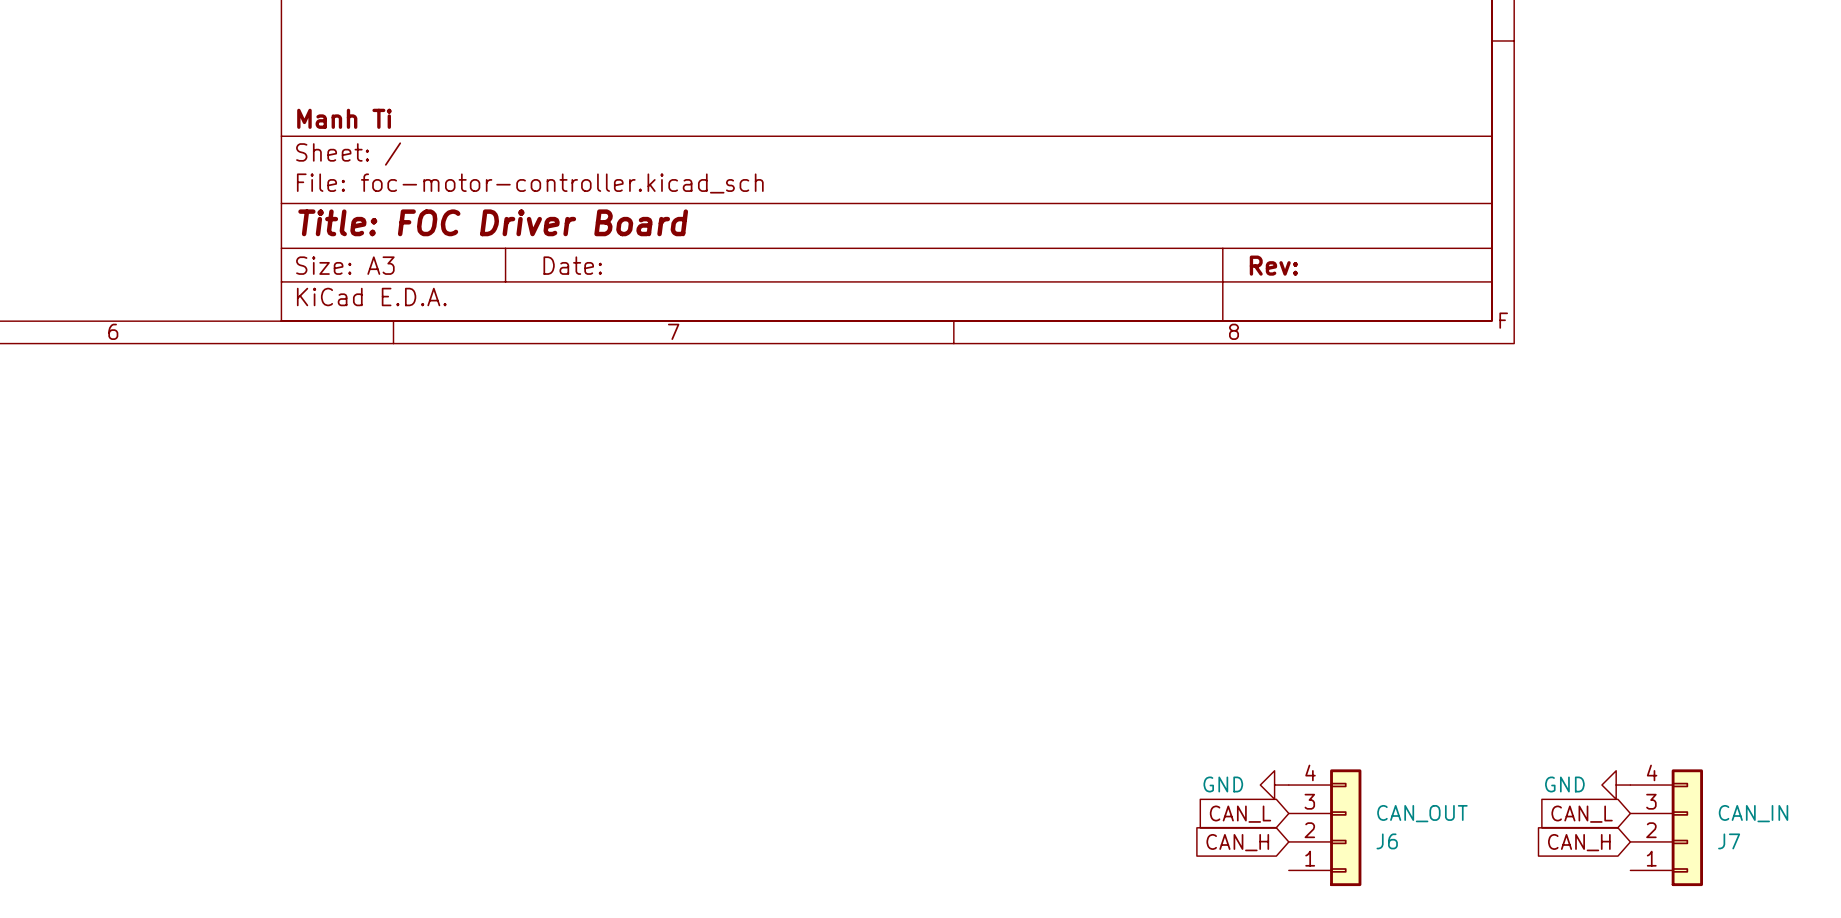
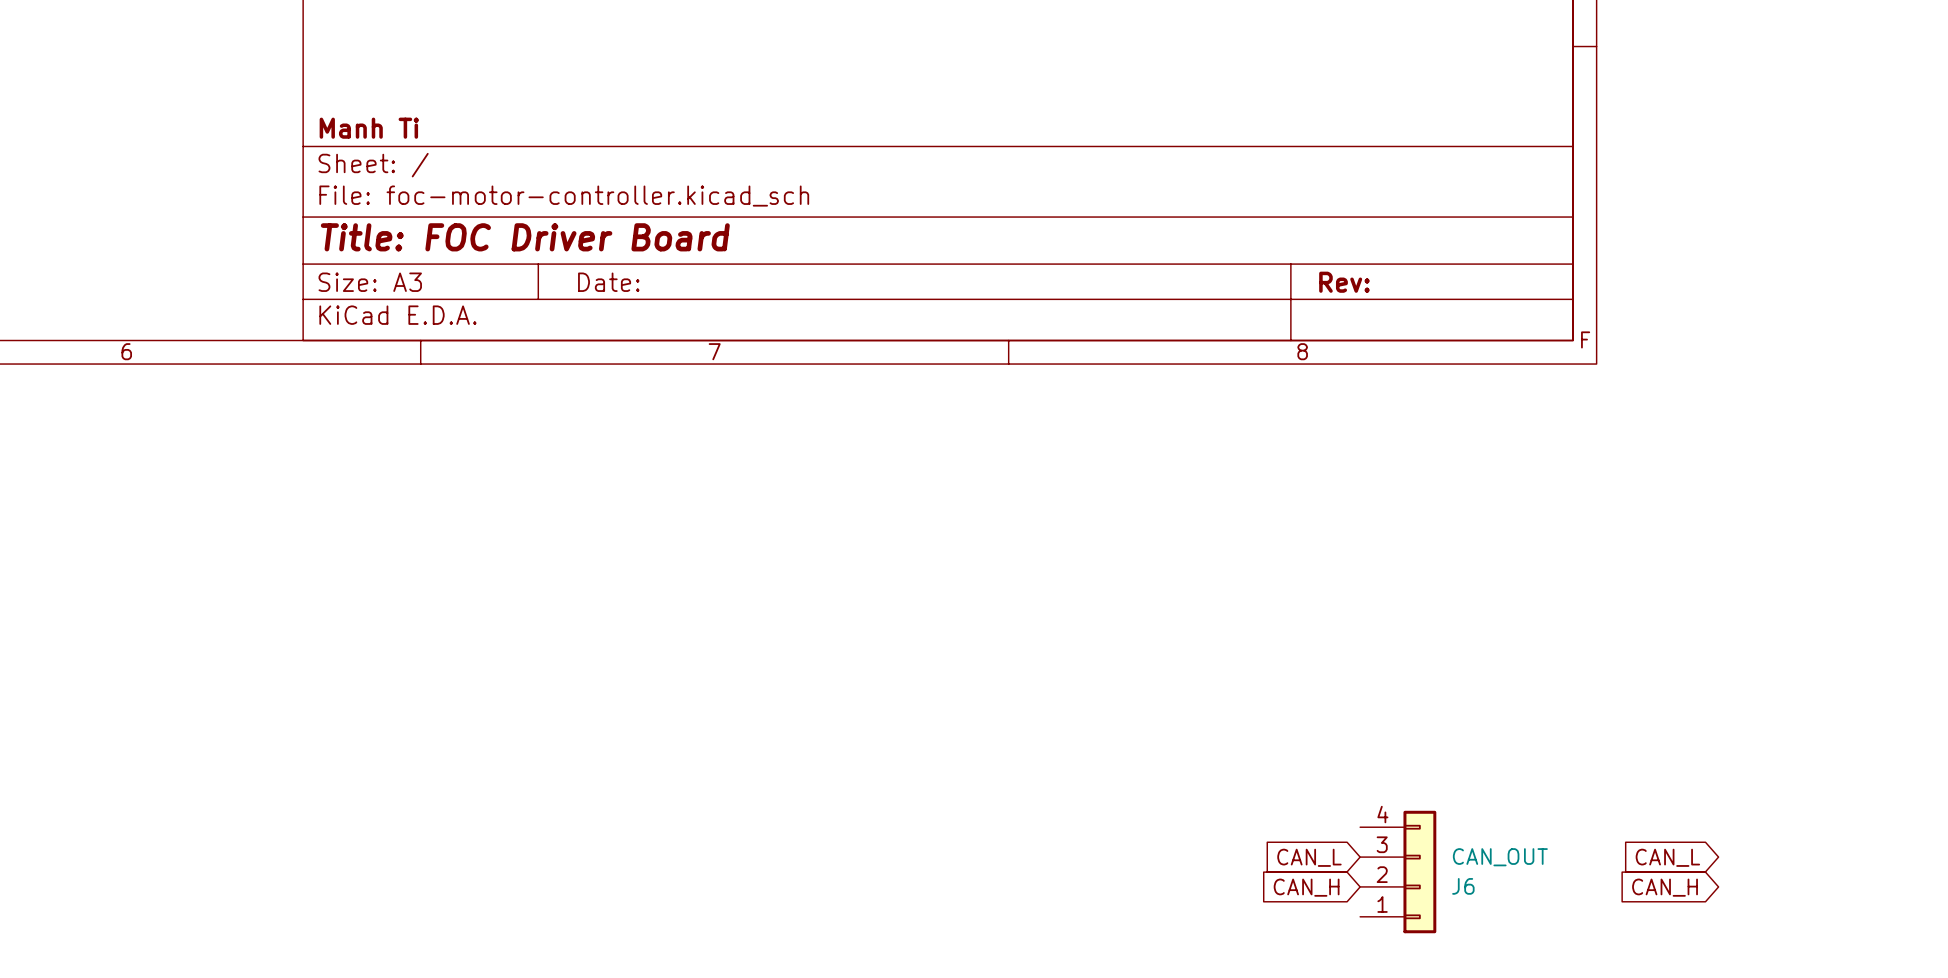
power symbol: GND (1274, 785) -> none
power symbol: GND (1616, 785) -> none
J7: CAN_IN (1666, 827) -> none

